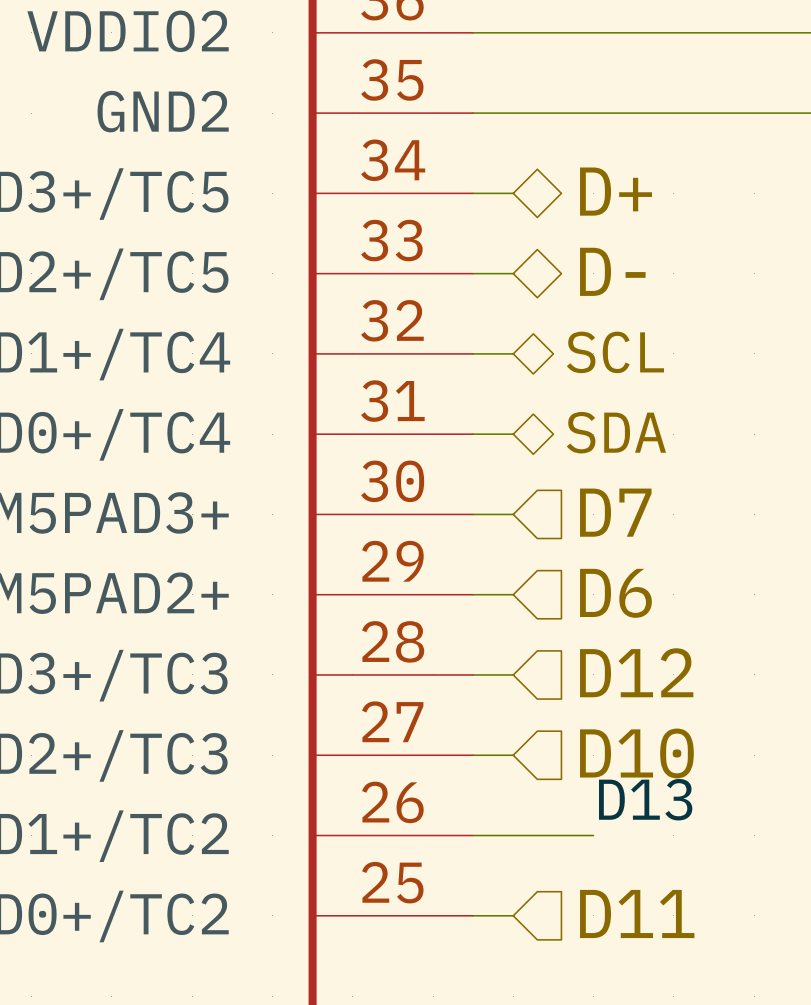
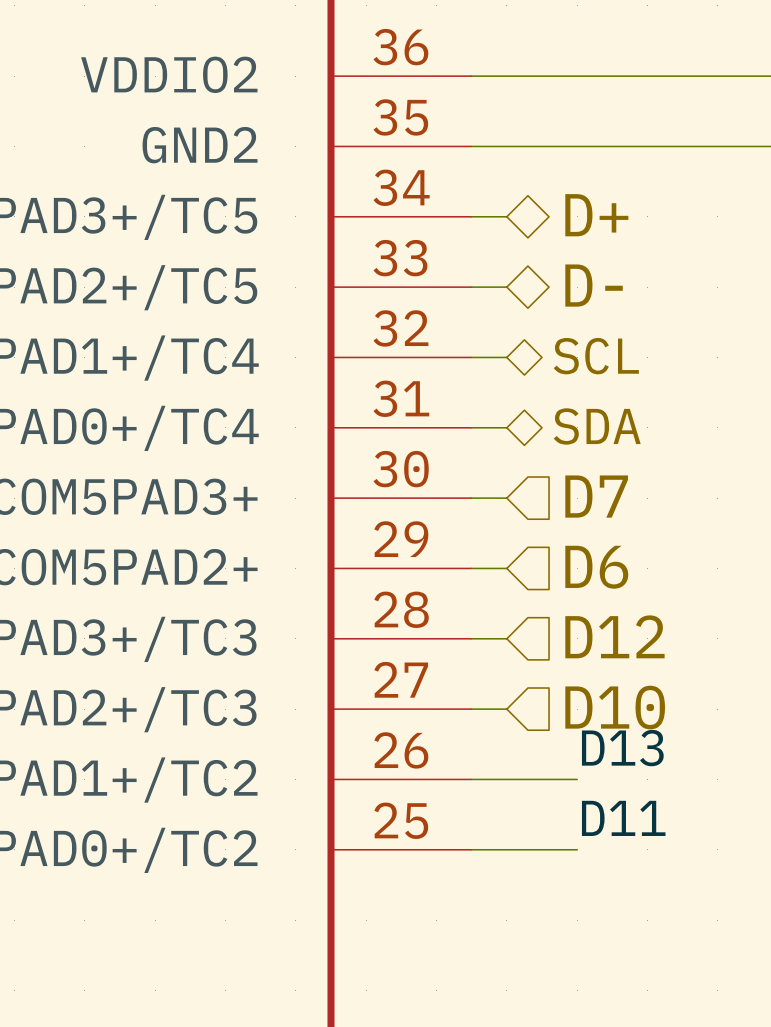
label: none -> D11 (623, 818)
hierarchical label: D11 (637, 913) -> none
wire: none -> (506, 849) (577, 849)

